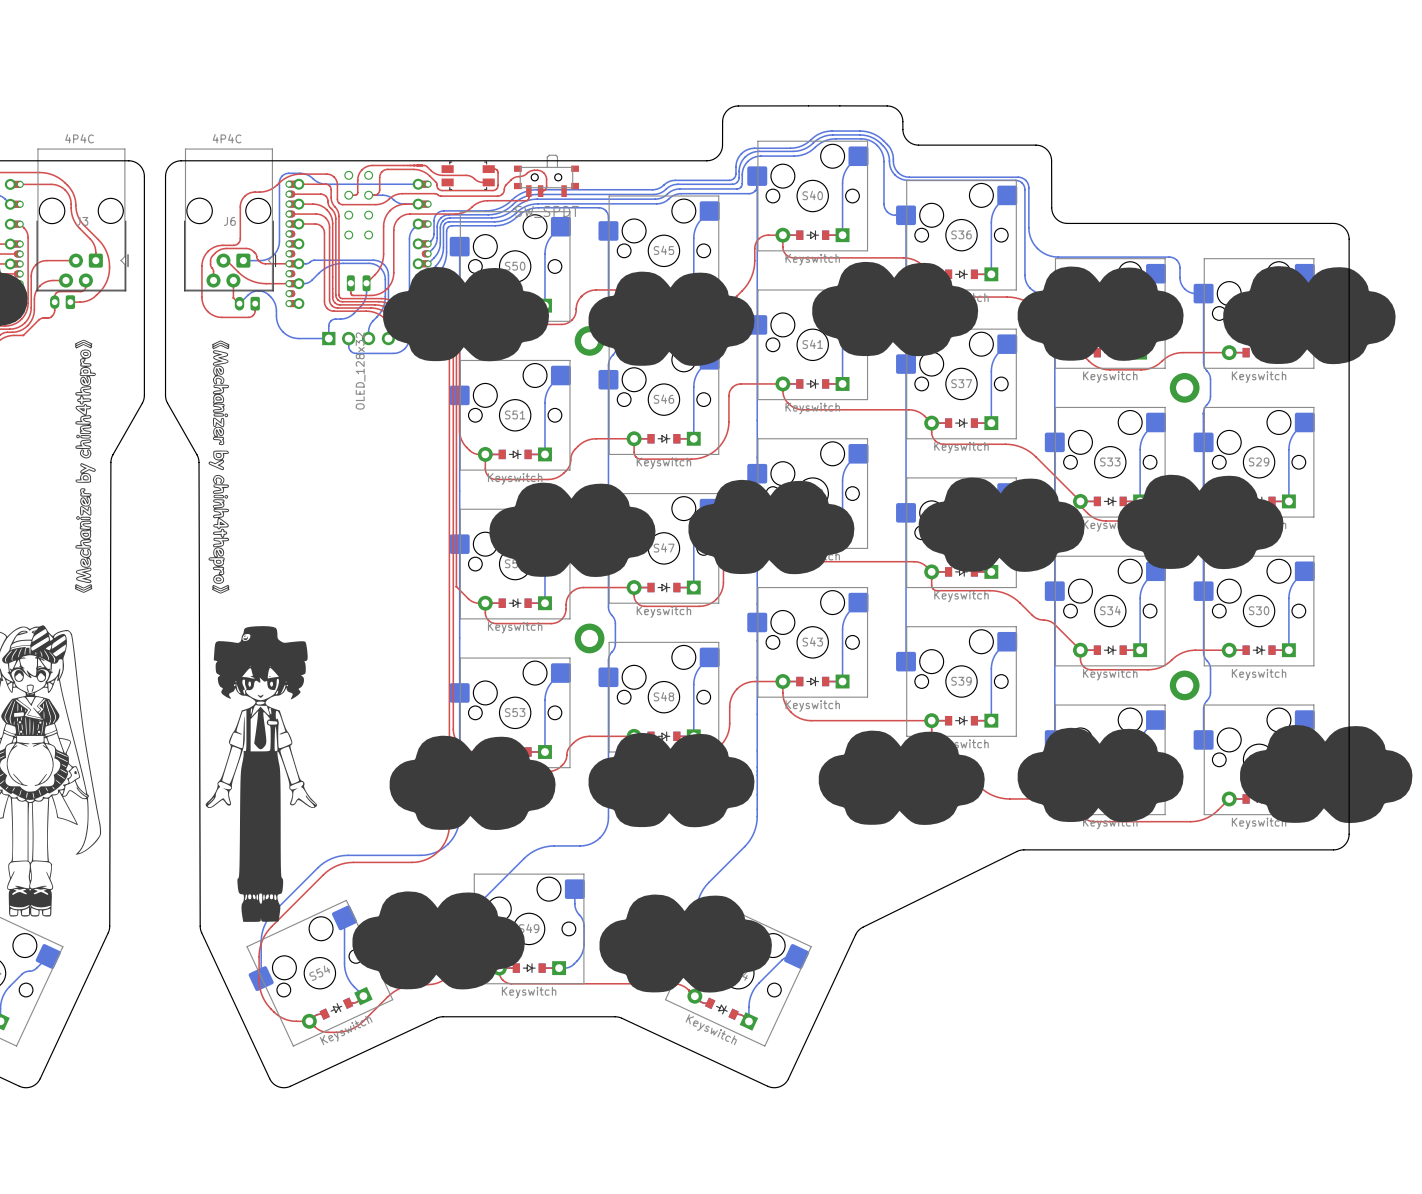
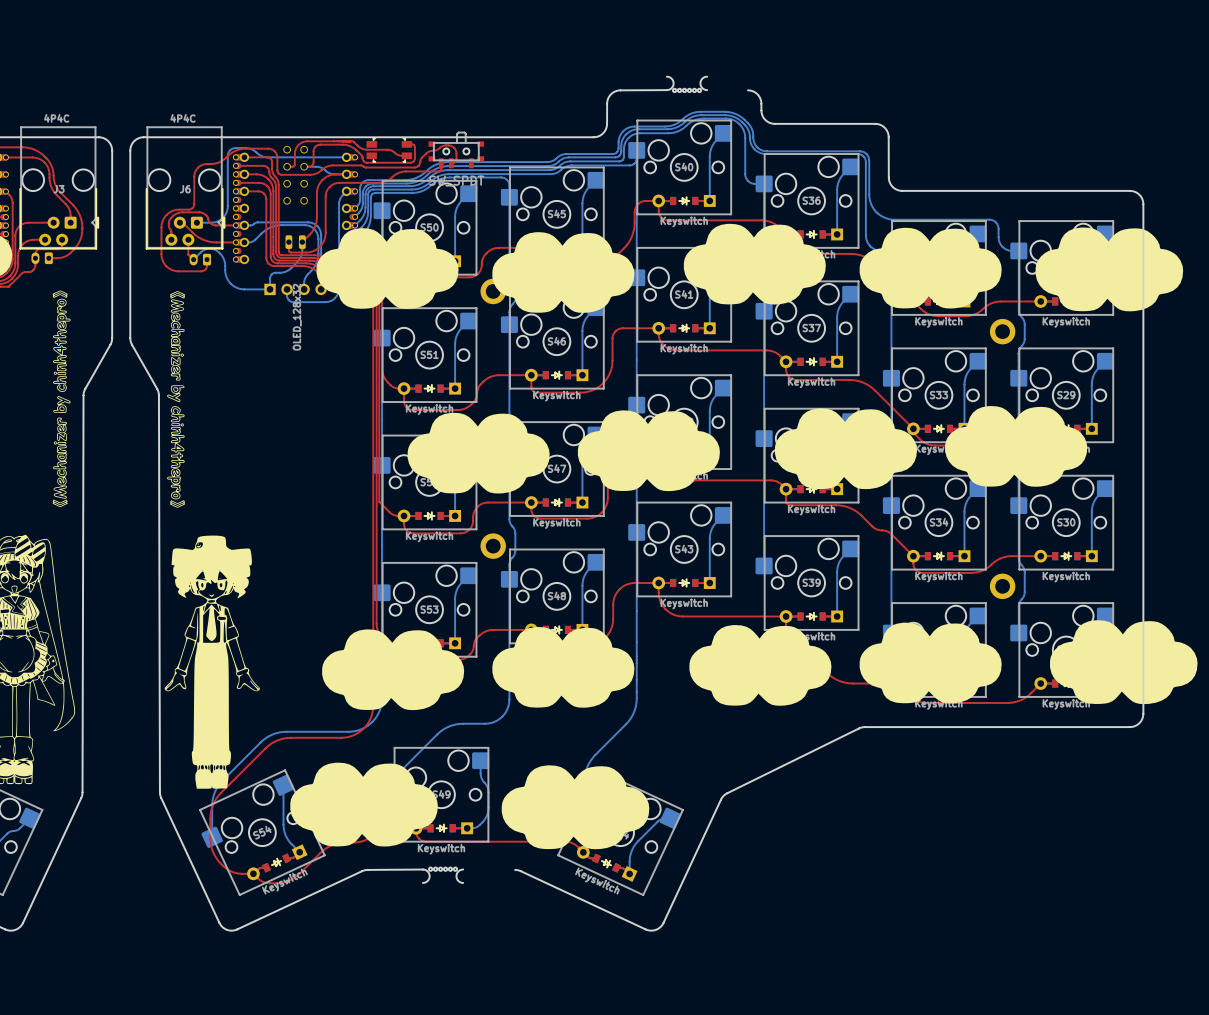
part: none -> (687, 84)
board edge: (738, 105) (887, 105) -> (620, 90) (666, 90)
board edge: (443, 1016) (615, 1016) -> (367, 869) (422, 869)
part: none -> (443, 875)

